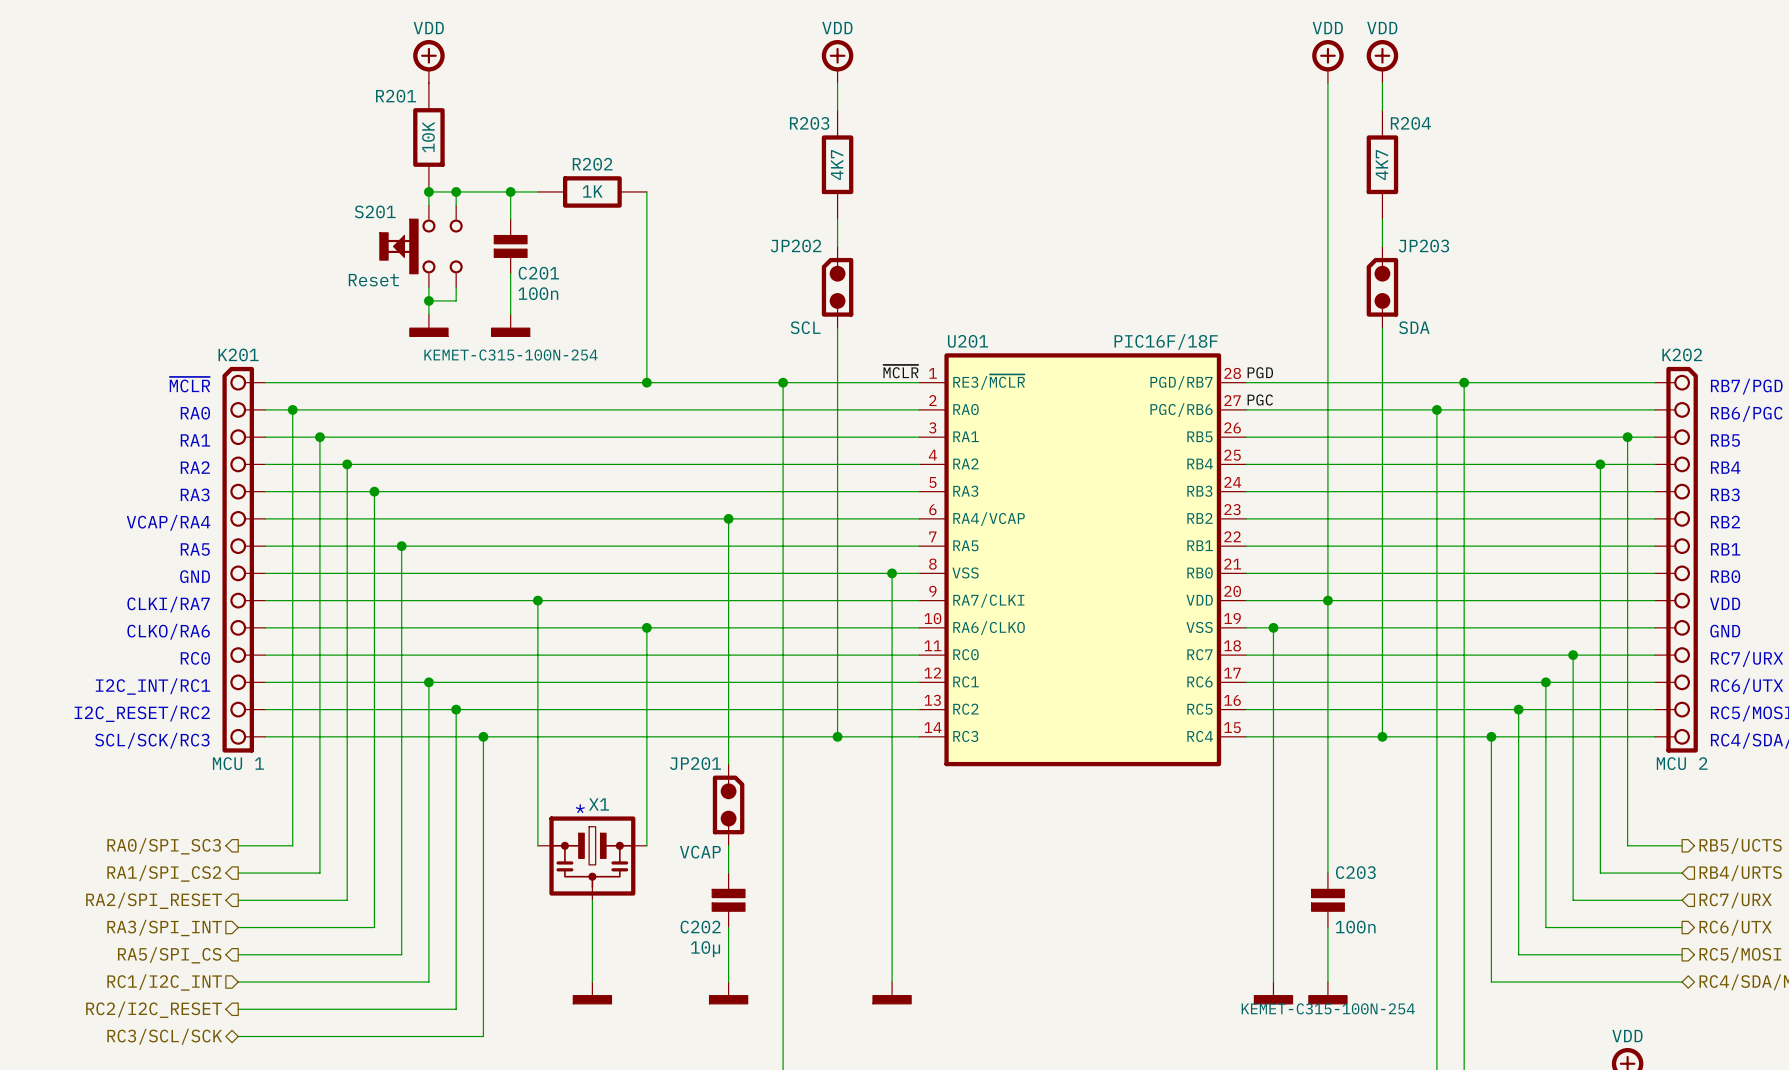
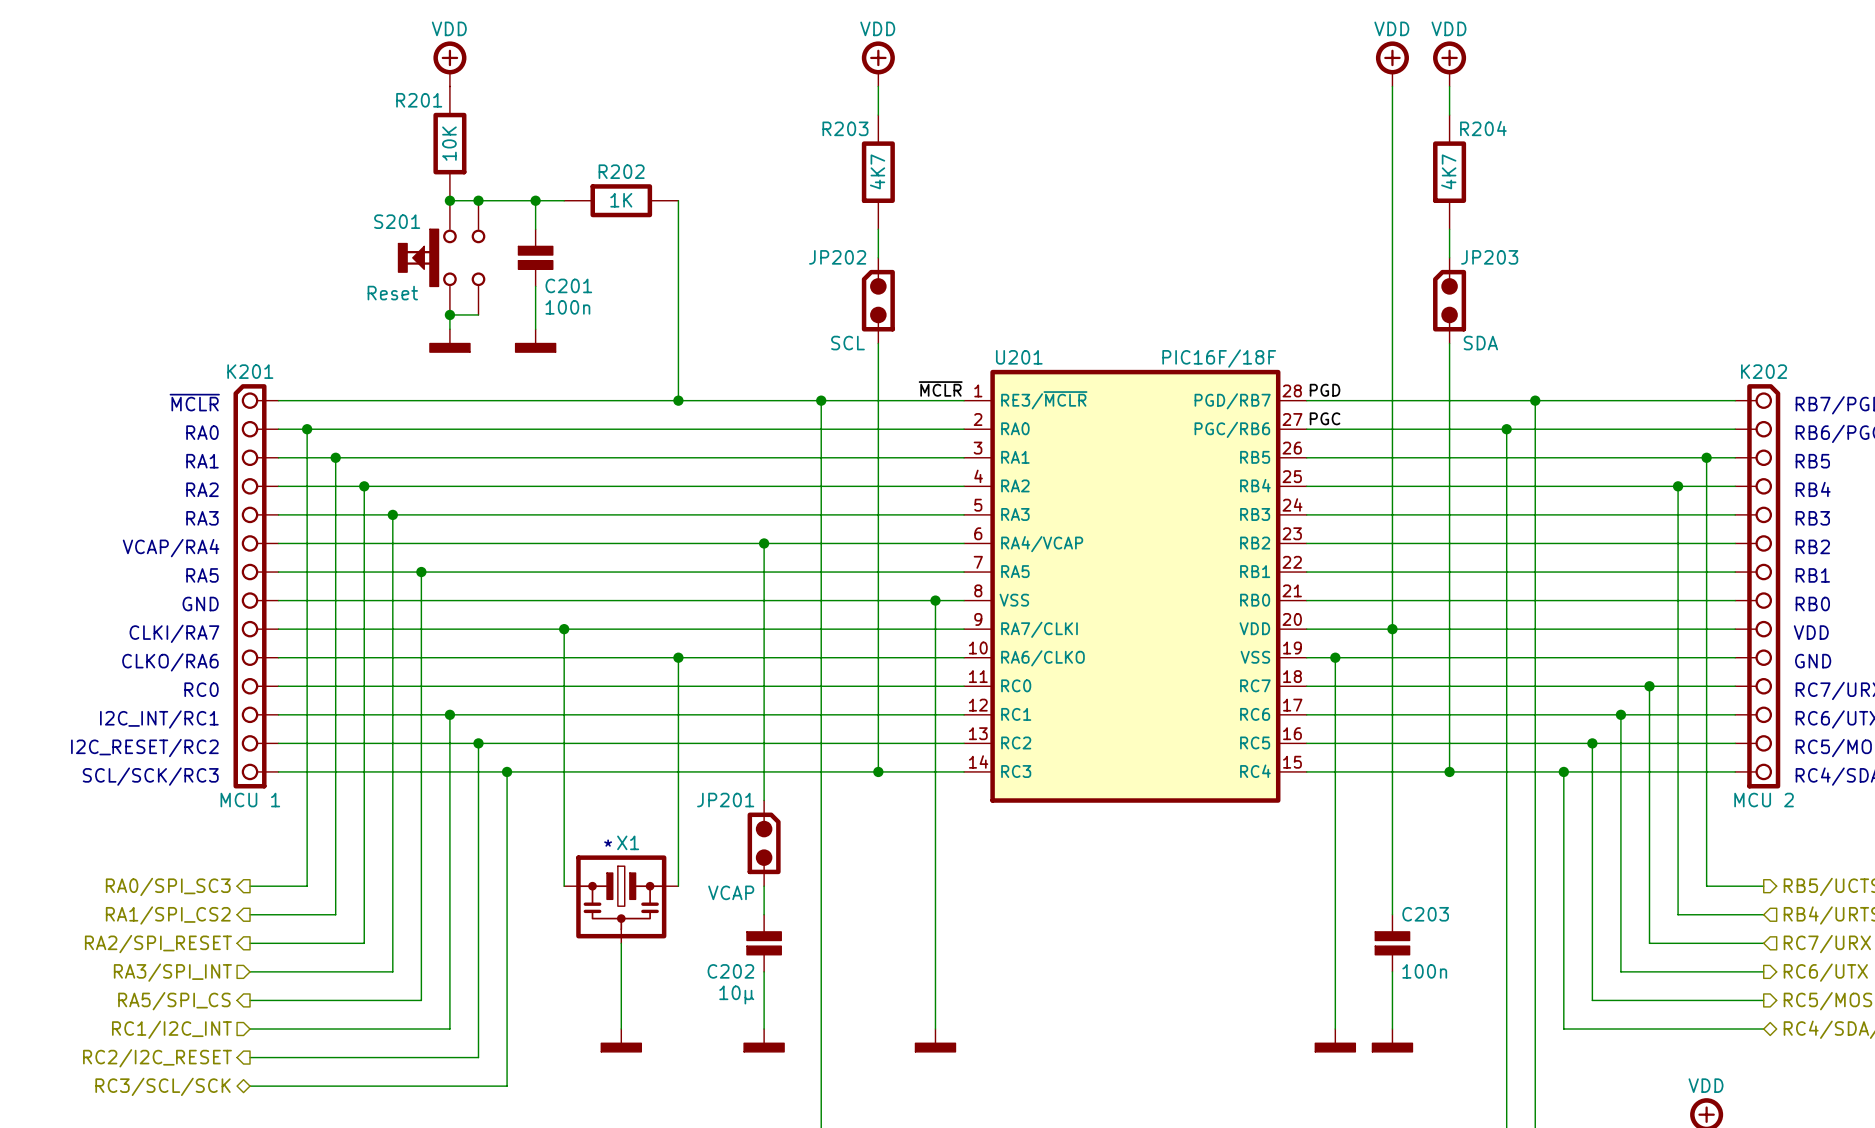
S201 symbol: [379, 205, 463, 288] -> [398, 200, 486, 315]
C201 text: KEMET-C315-100N-254 (511, 355) -> none
C203 text: KEMET-C315-100N-254 (1328, 1008) -> none

